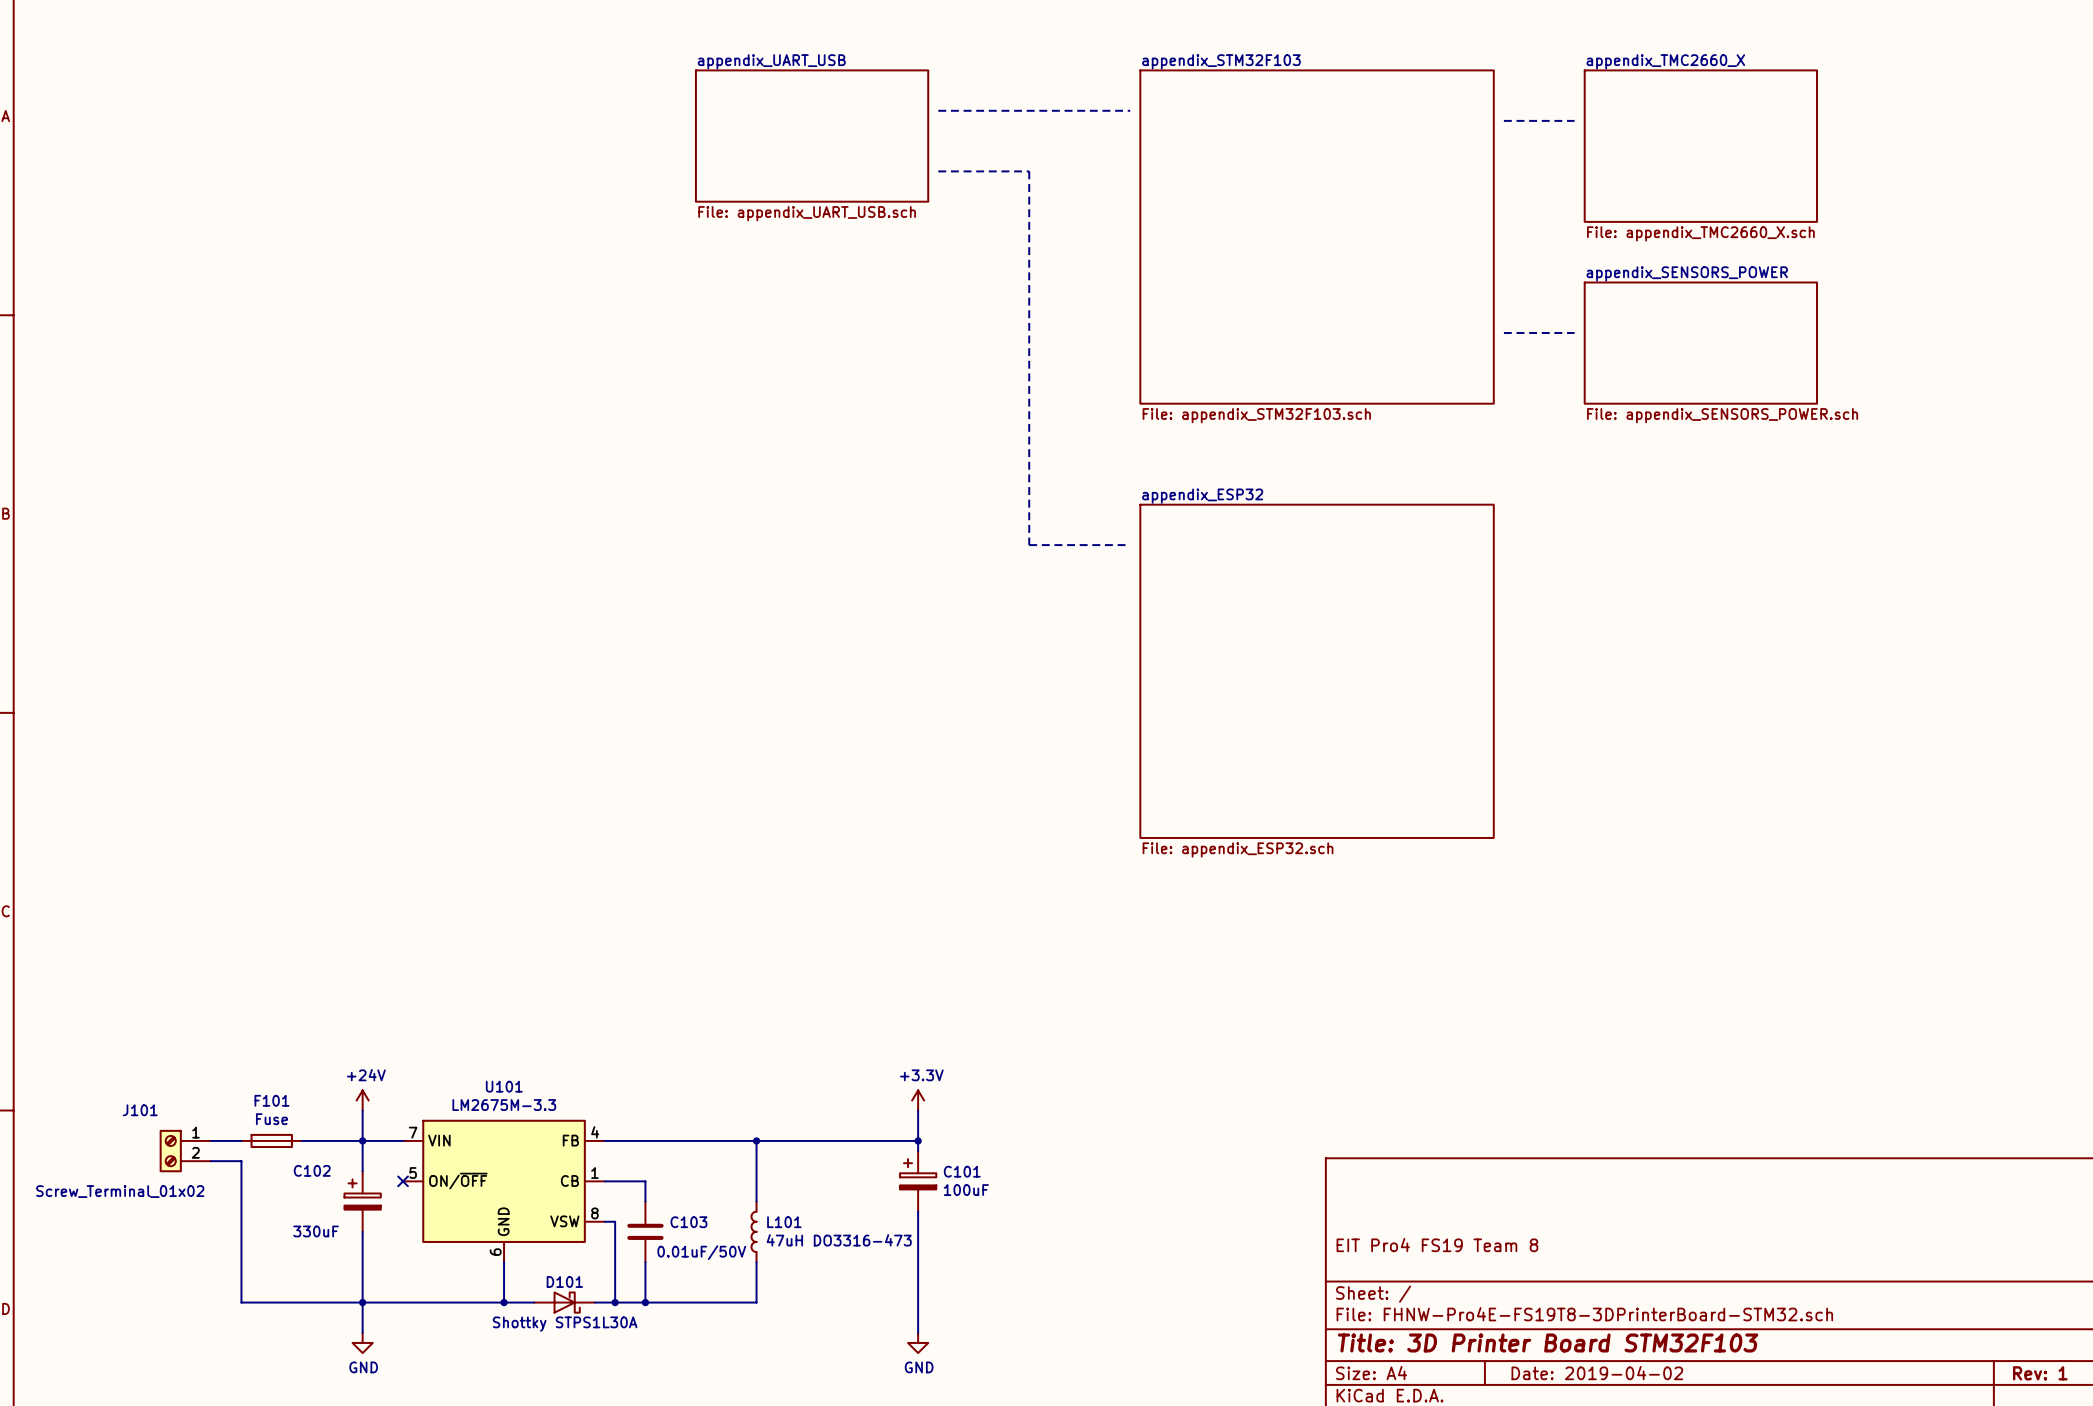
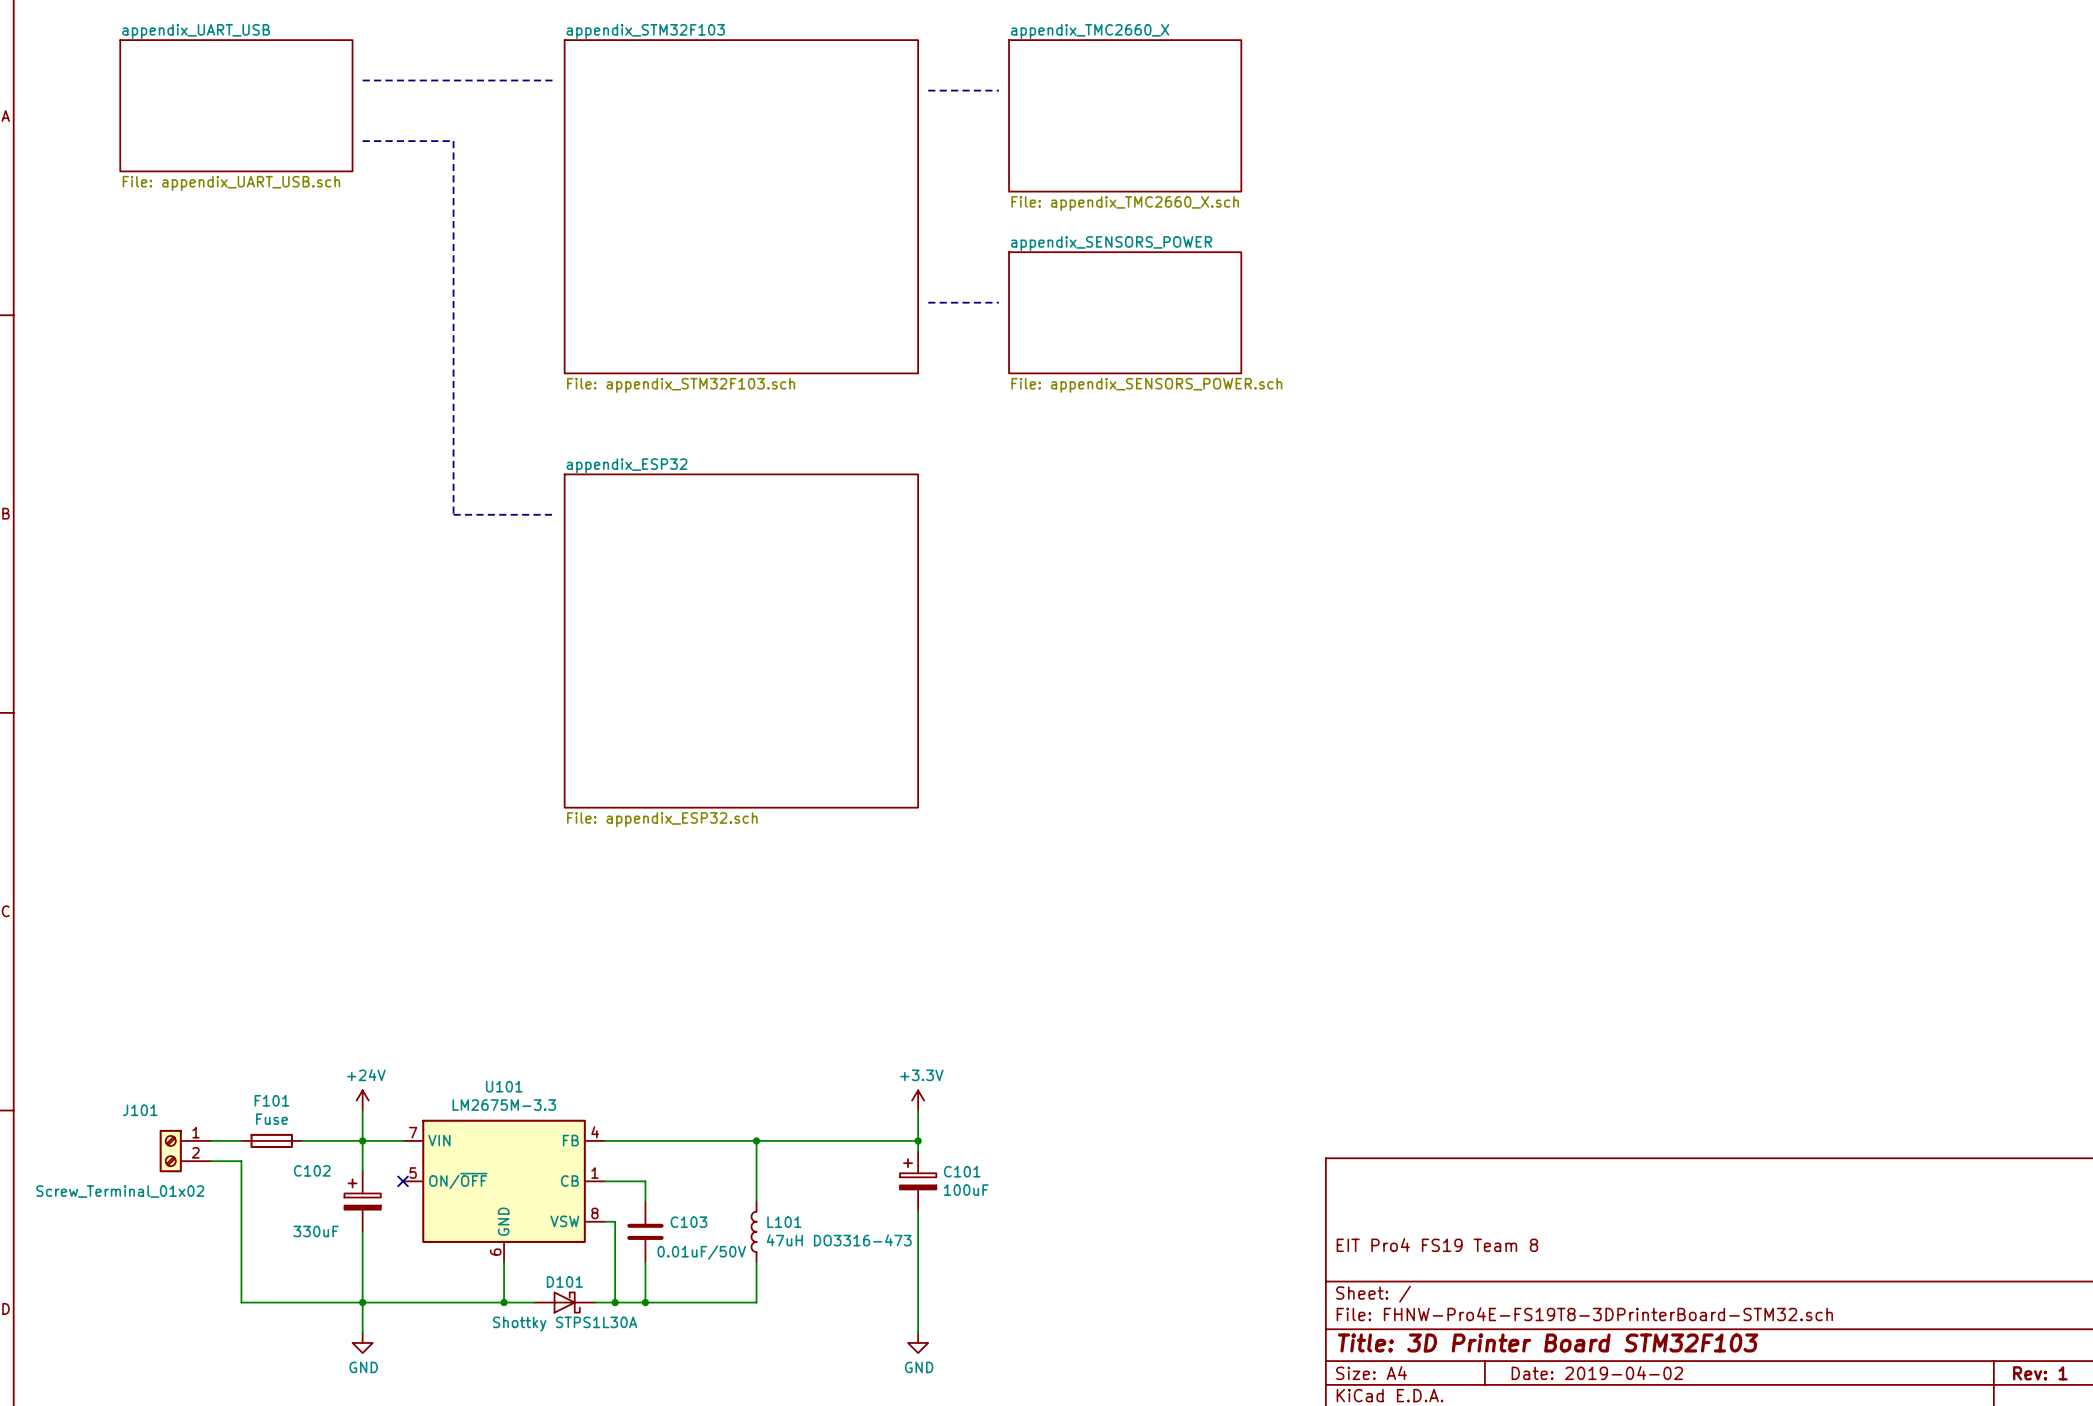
line: none -> (362, 80) (554, 80)
line: none -> (928, 90) (998, 90)
sheet appendix_UART_USB: none -> File: appendix_UART_USB.sch (236, 105)
line: (938, 110) (1130, 110) -> none
line: (1503, 120) (1574, 120) -> none
sheet appendix_UART_USB: File: appendix_UART_USB.sch (812, 136) -> none
line: none -> (362, 141) (453, 141) (453, 514) (554, 514)
sheet appendix_TMC2660_X position: (1700, 146) -> (1125, 115)
line: (938, 171) (1029, 171) (1029, 545) (1130, 545) -> none
sheet appendix_STM32F103 position: (1317, 237) -> (741, 206)
line: none -> (928, 302) (998, 302)
sheet appendix_SENSORS_POWER: none -> File: appendix_SENSORS_POWER.sch (1125, 312)
line: (1503, 332) (1574, 332) -> none
sheet appendix_SENSORS_POWER: File: appendix_SENSORS_POWER.sch (1700, 343) -> none
sheet appendix_ESP32 position: (1317, 671) -> (741, 641)

